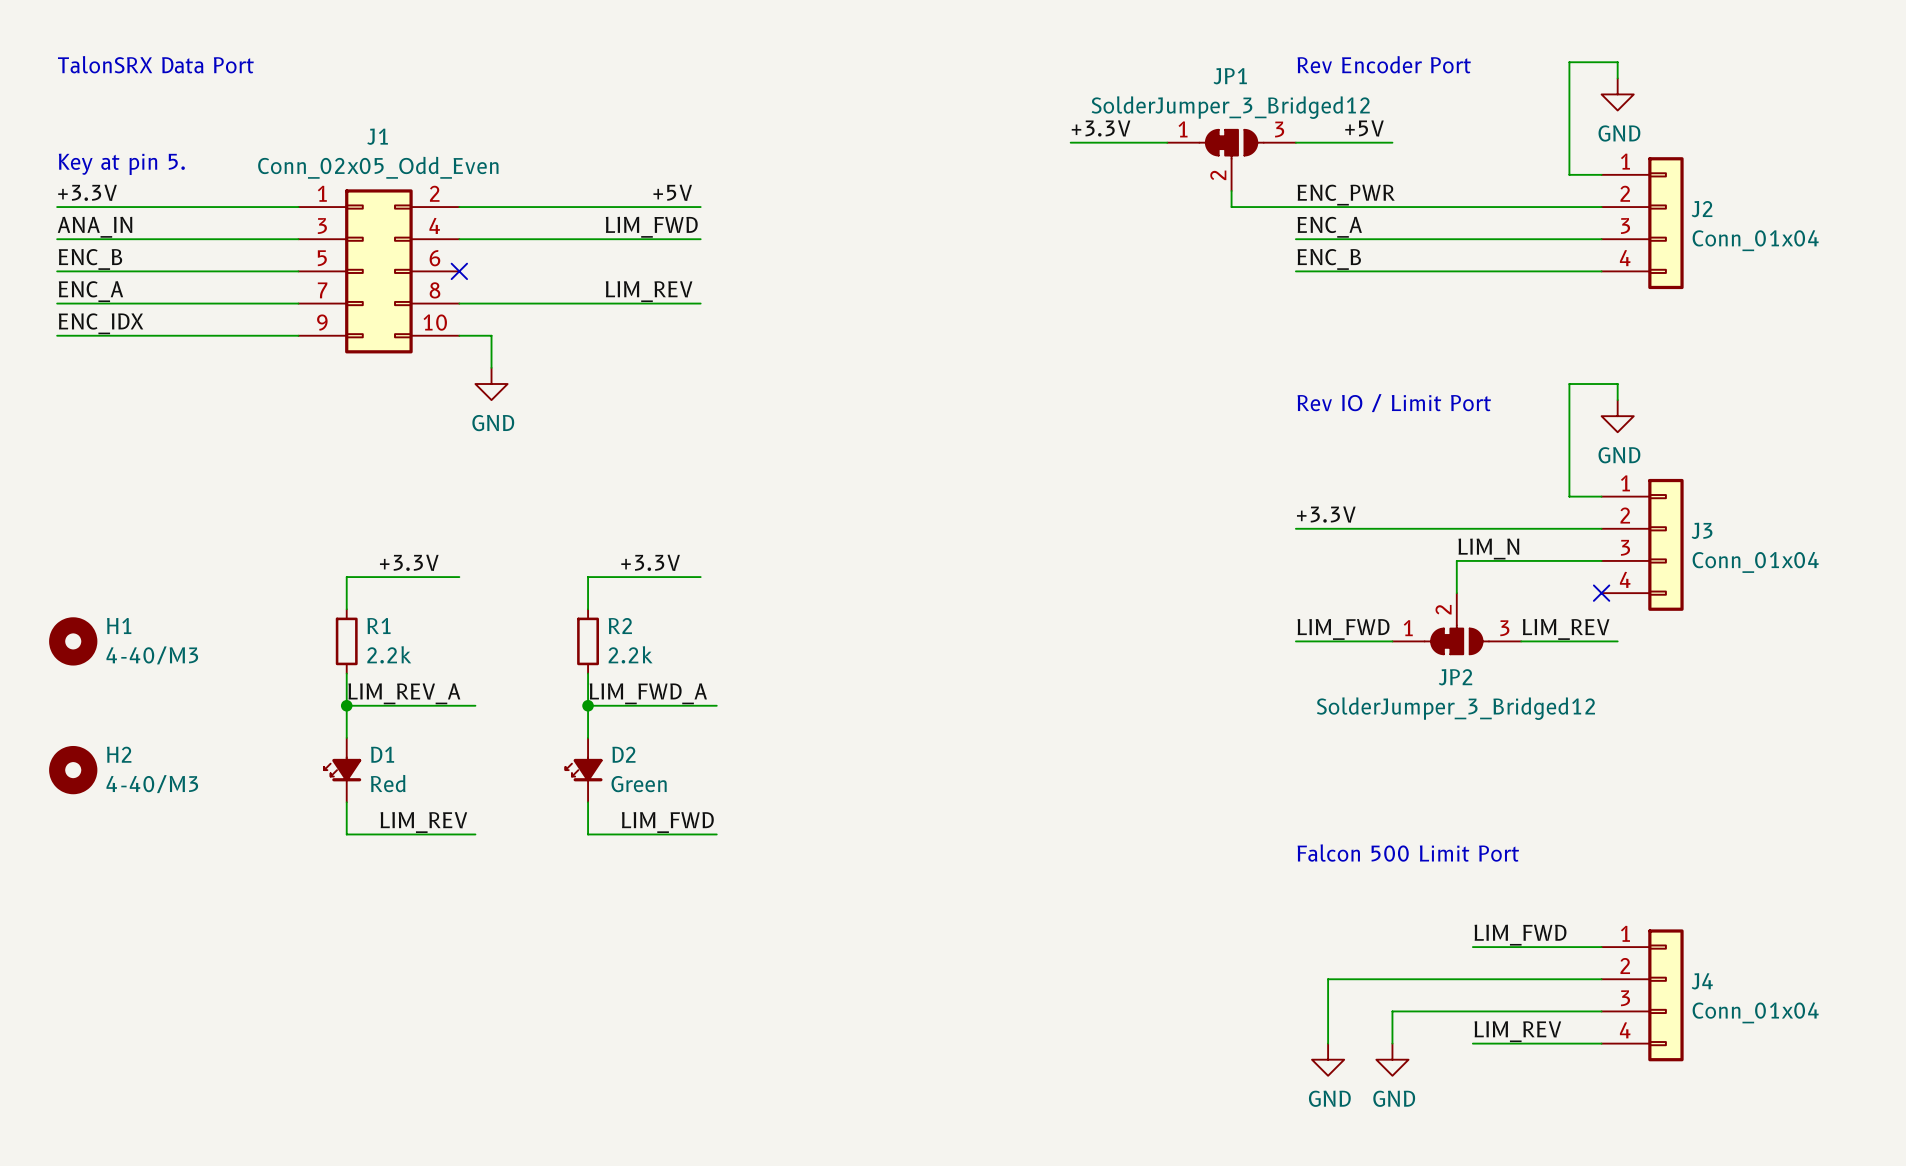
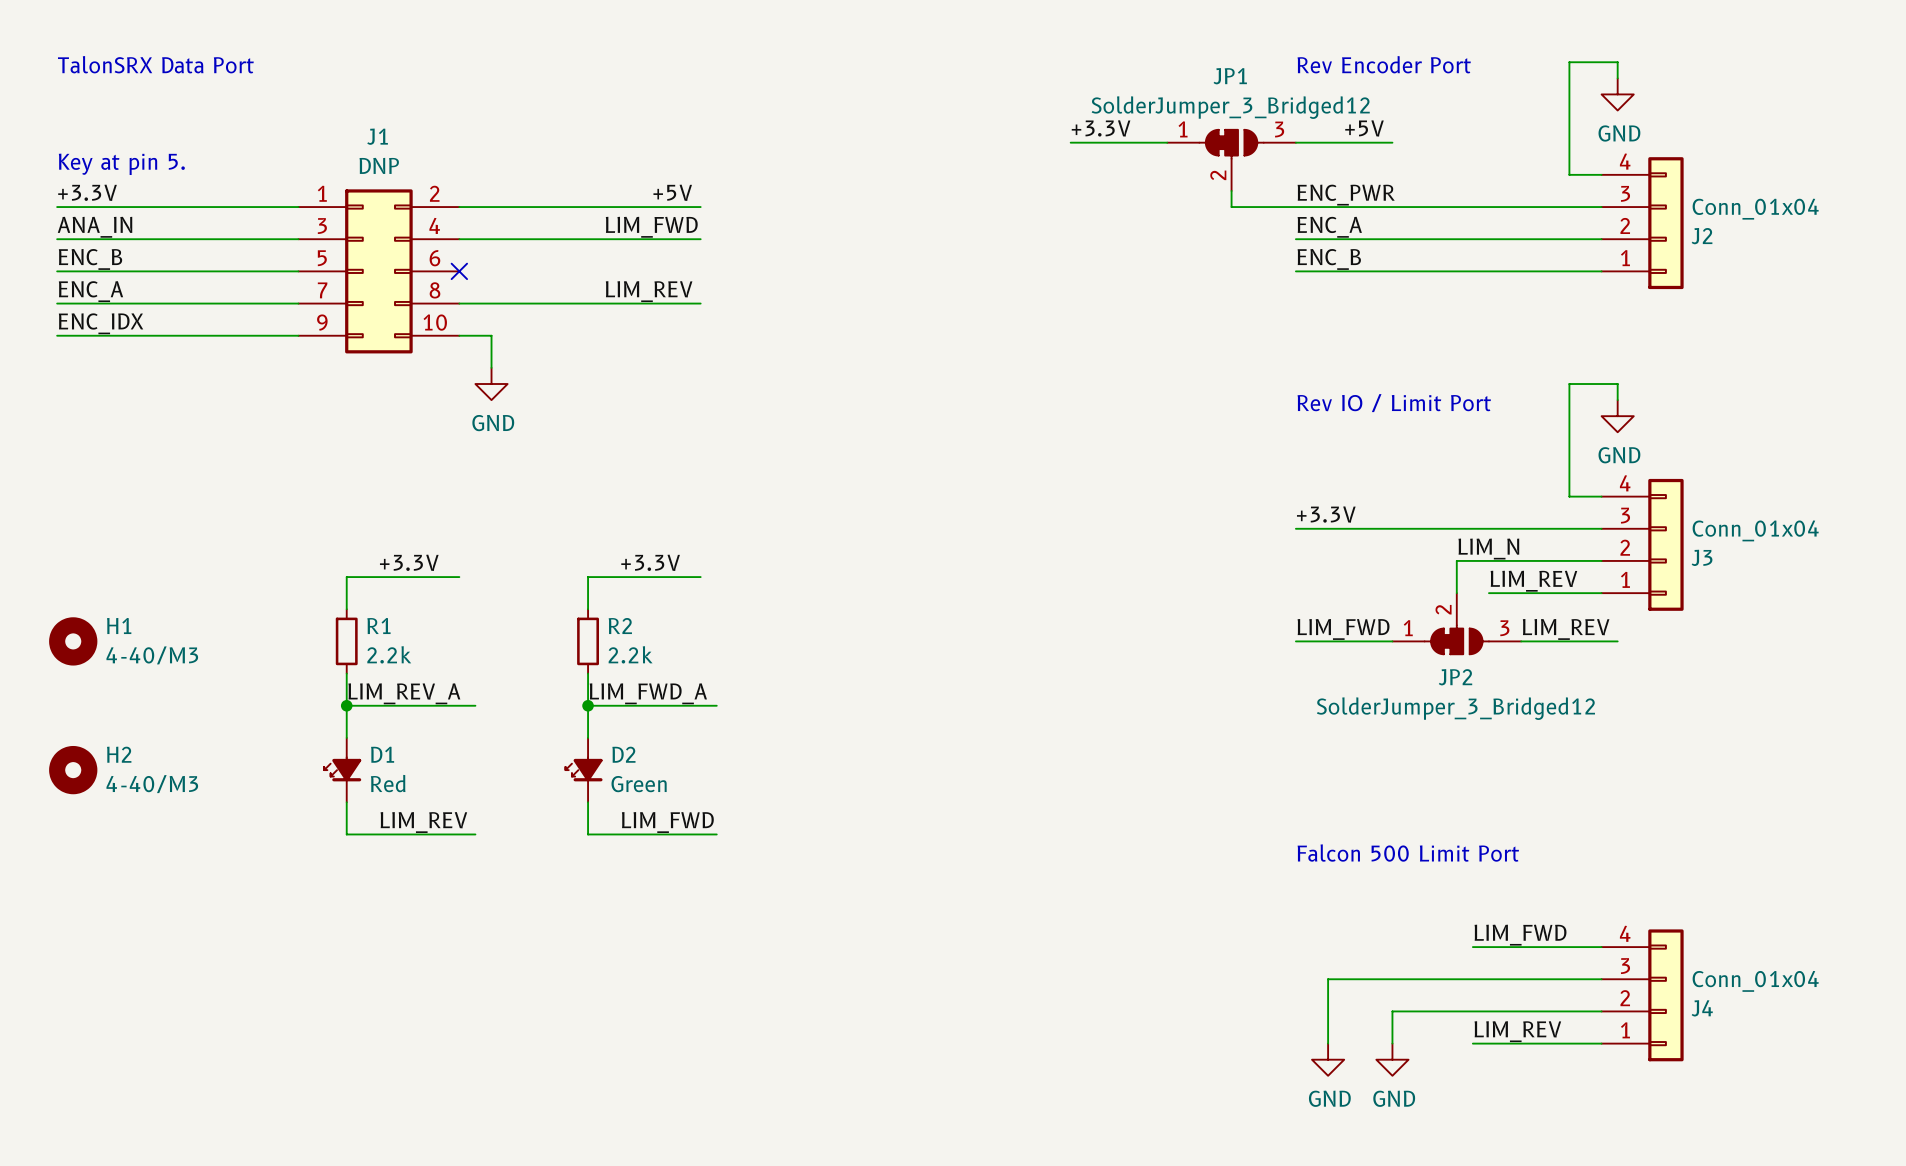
J1 value: Conn_02x05_Odd_Even (378, 167) -> DNP (379, 165)
J2 flip: as is (1665, 223) -> up-down (1665, 223)
J3 flip: as is (1665, 544) -> up-down (1665, 544)
label: none -> LIM_REV (1533, 581)
wire: none -> (1488, 593) (1601, 593)
no-connect mark: (1601, 593) -> none
J4 flip: as is (1665, 995) -> up-down (1665, 995)

